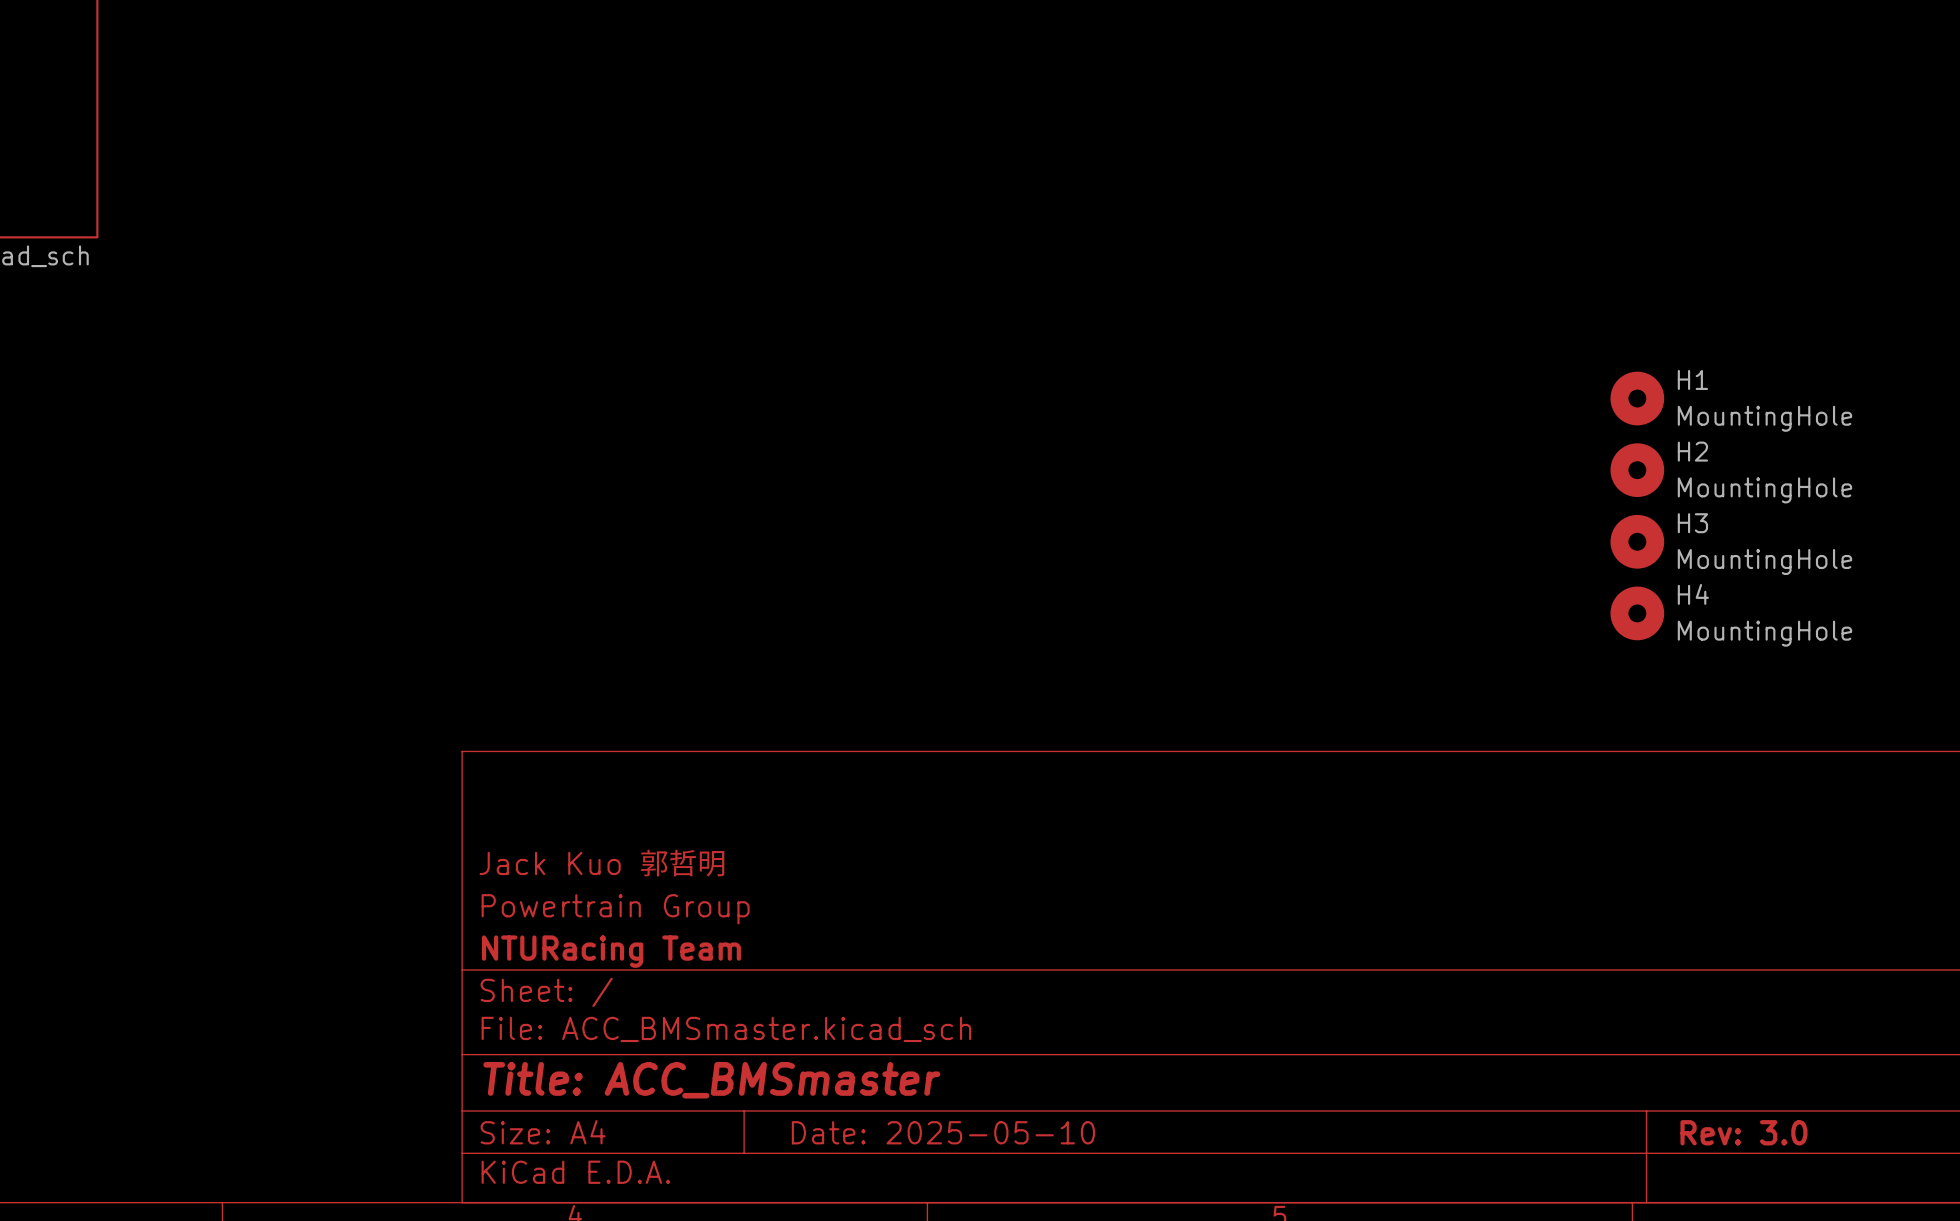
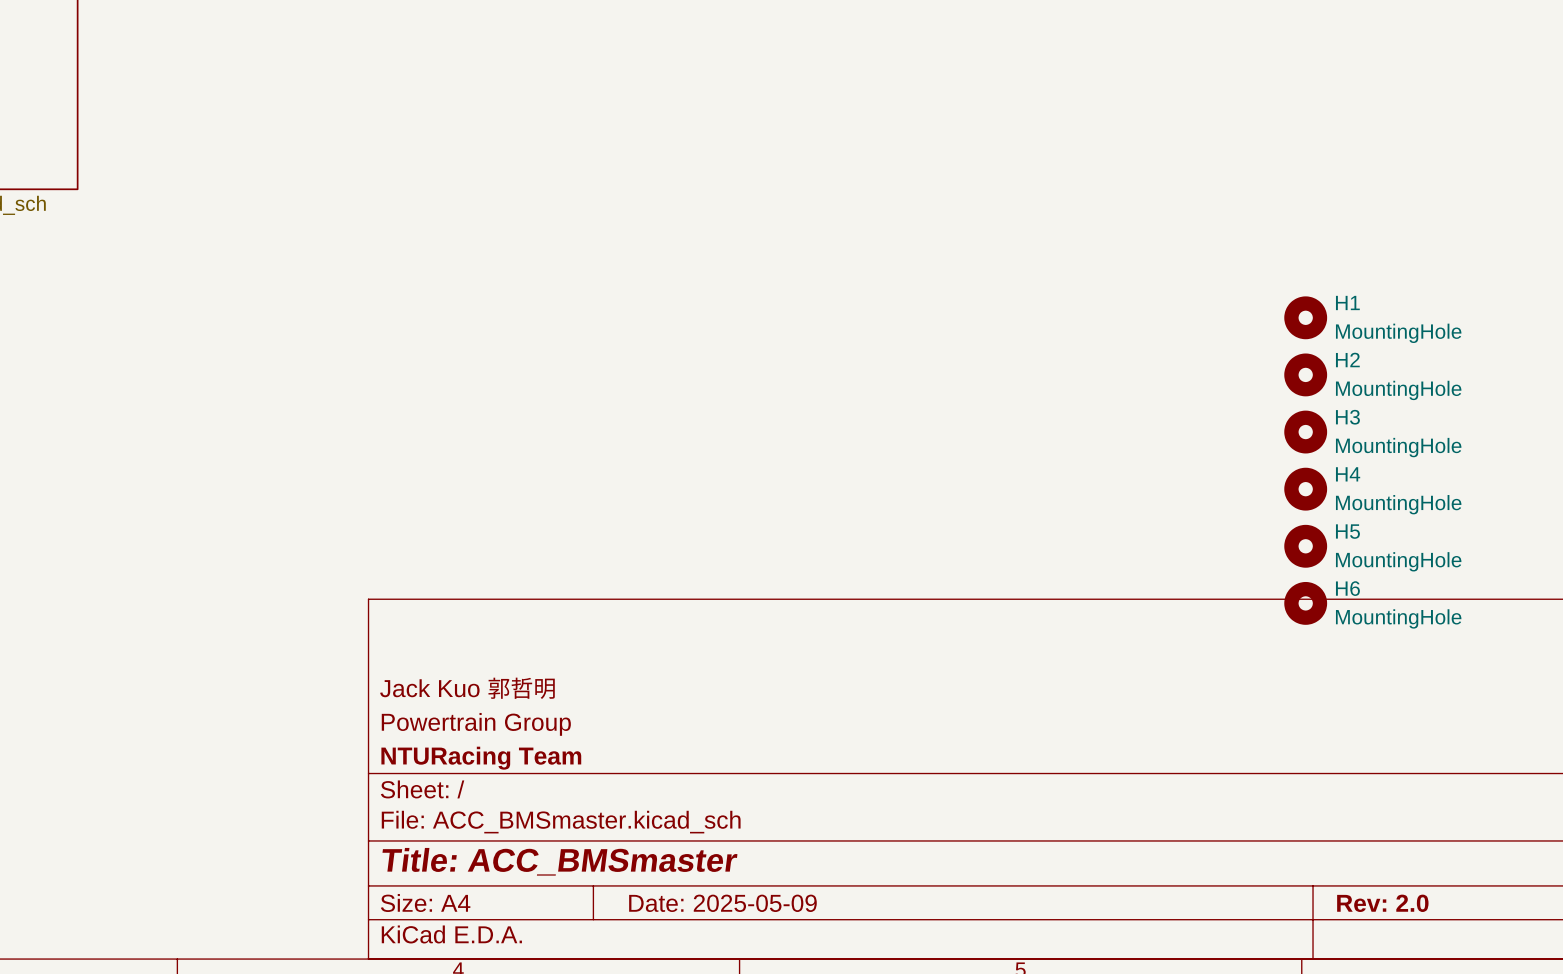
H5: none -> MountingHole (1305, 546)
H6: none -> MountingHole (1305, 603)
title block: Date: 2025-05-10 (943, 1132) -> Date: 2025-05-09 (722, 903)
title block: Rev: 3.0 (1743, 1132) -> Rev: 2.0 (1382, 903)

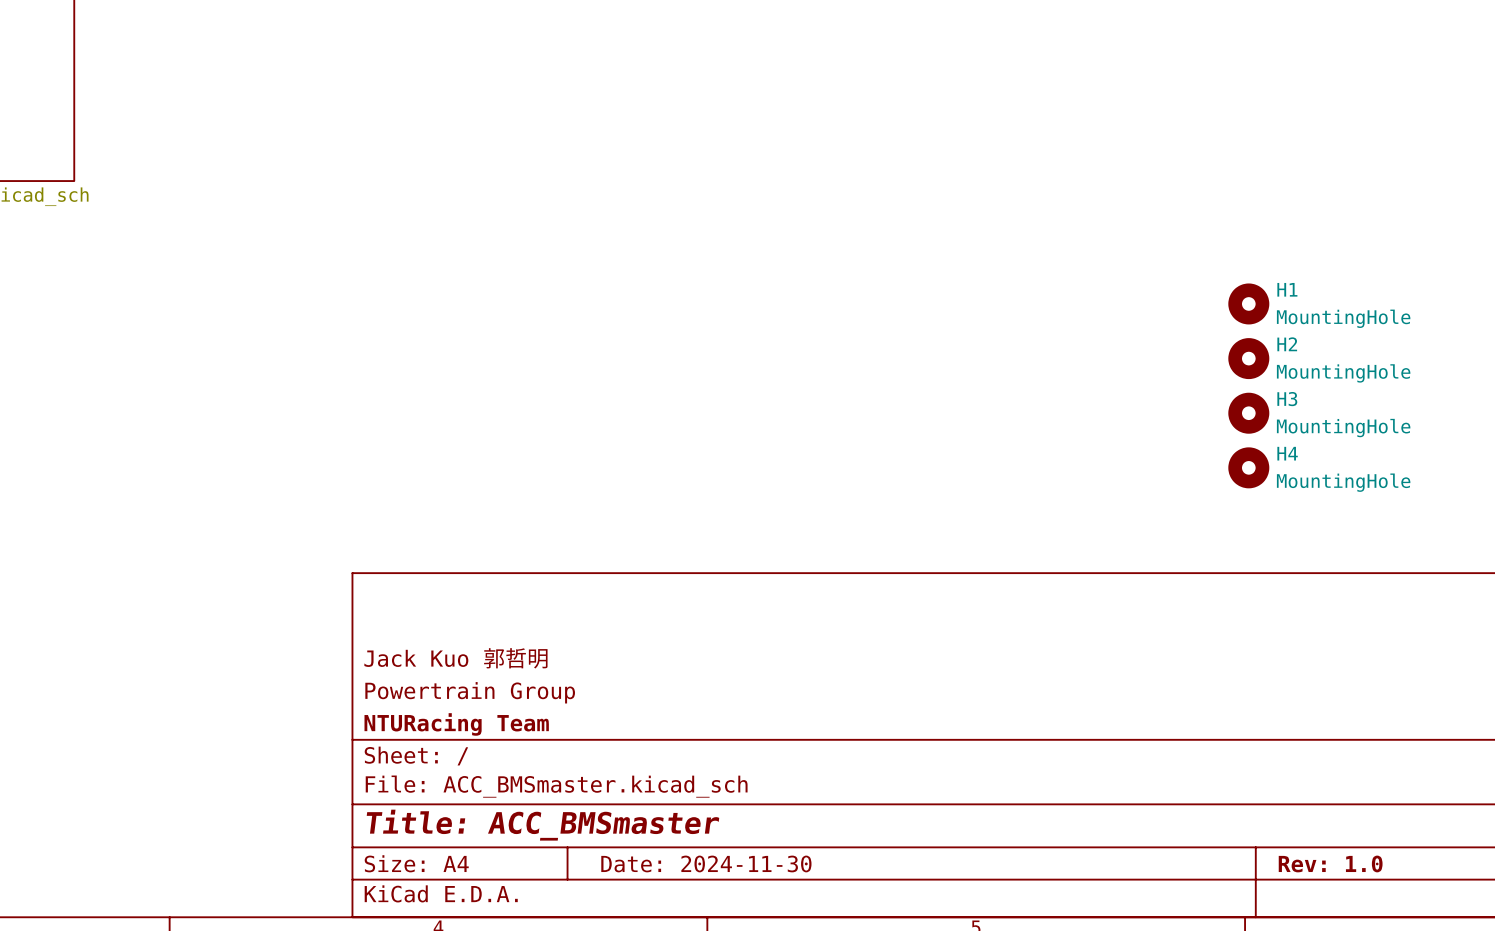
H5: MountingHole (1305, 546) -> none
H6: MountingHole (1305, 603) -> none
title block: Date: 2025-05-09 (722, 903) -> Date: 2024-11-30 (706, 863)
title block: Rev: 2.0 (1382, 903) -> Rev: 1.0 (1330, 863)

